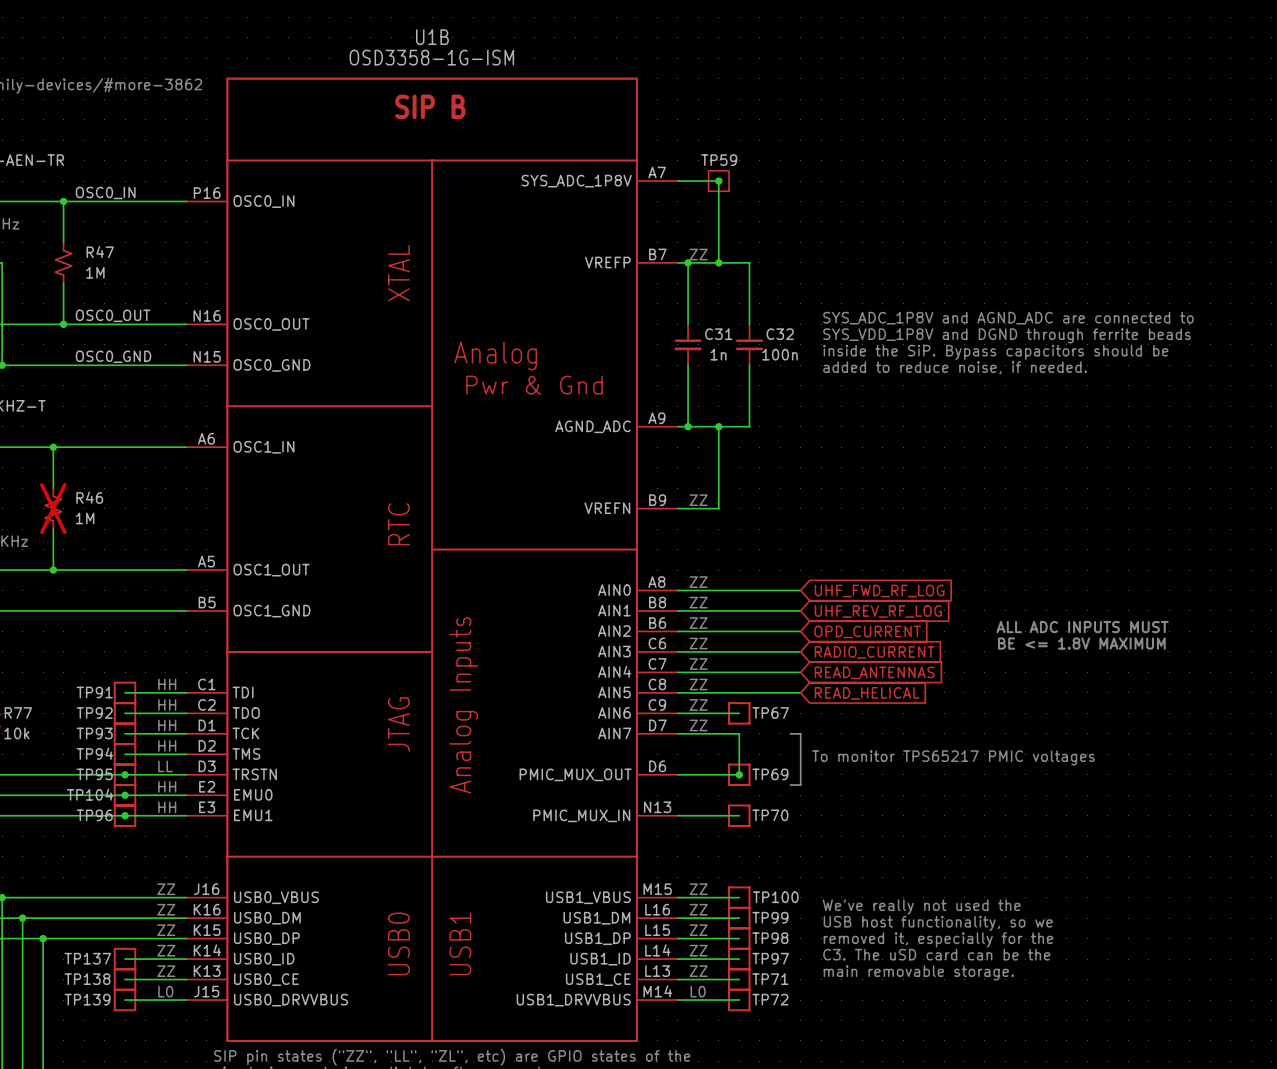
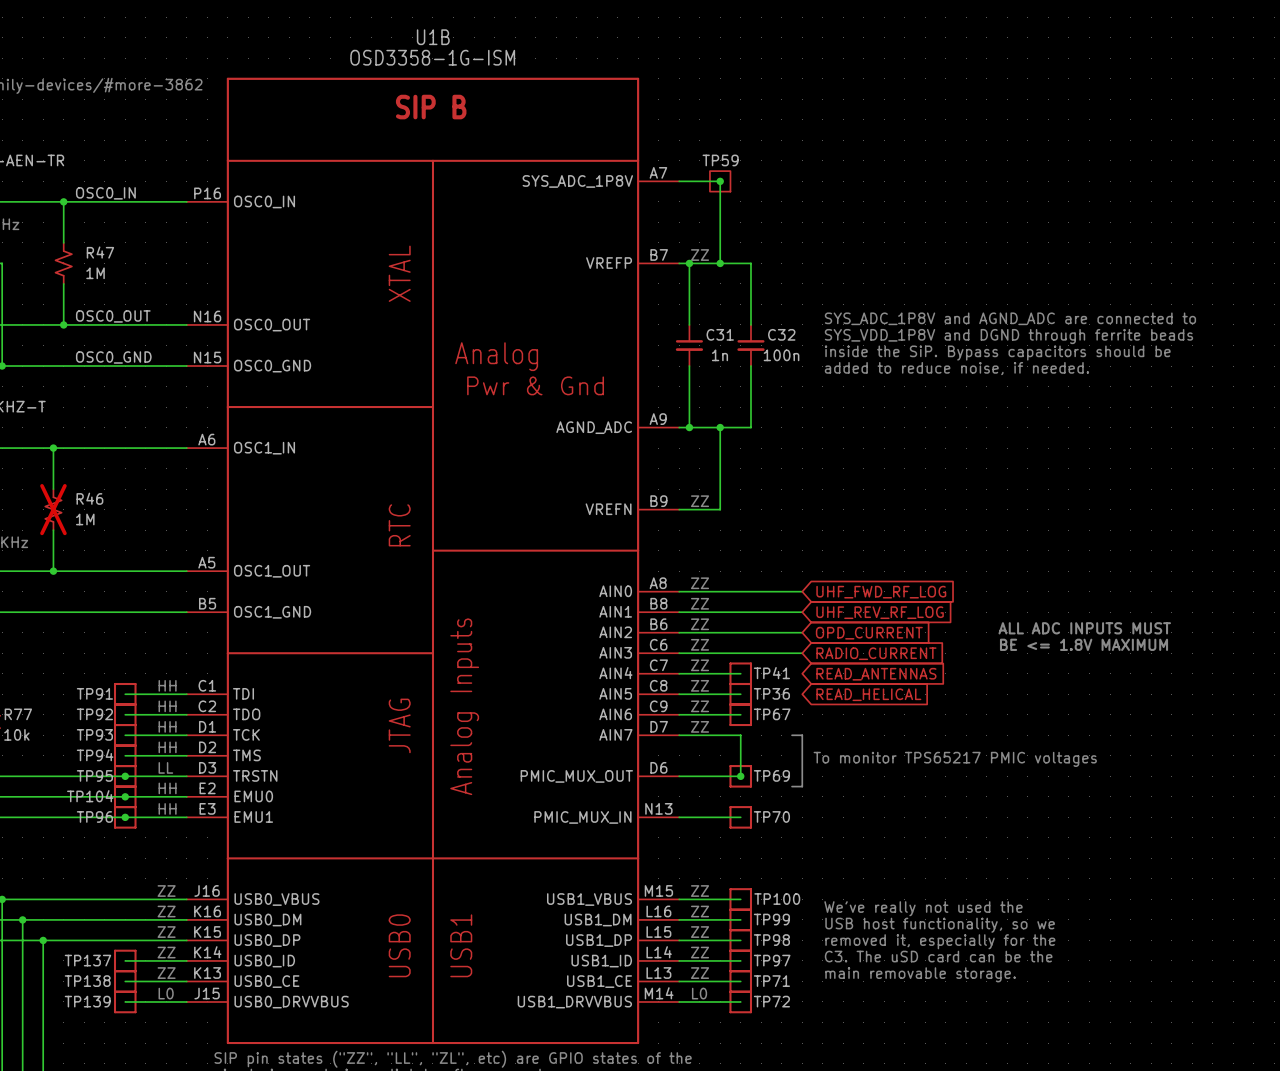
wire: (739, 672) (800, 672) -> none
TP41: none -> (740, 673)
wire: (739, 692) (800, 692) -> none
TP36: none -> (740, 694)

